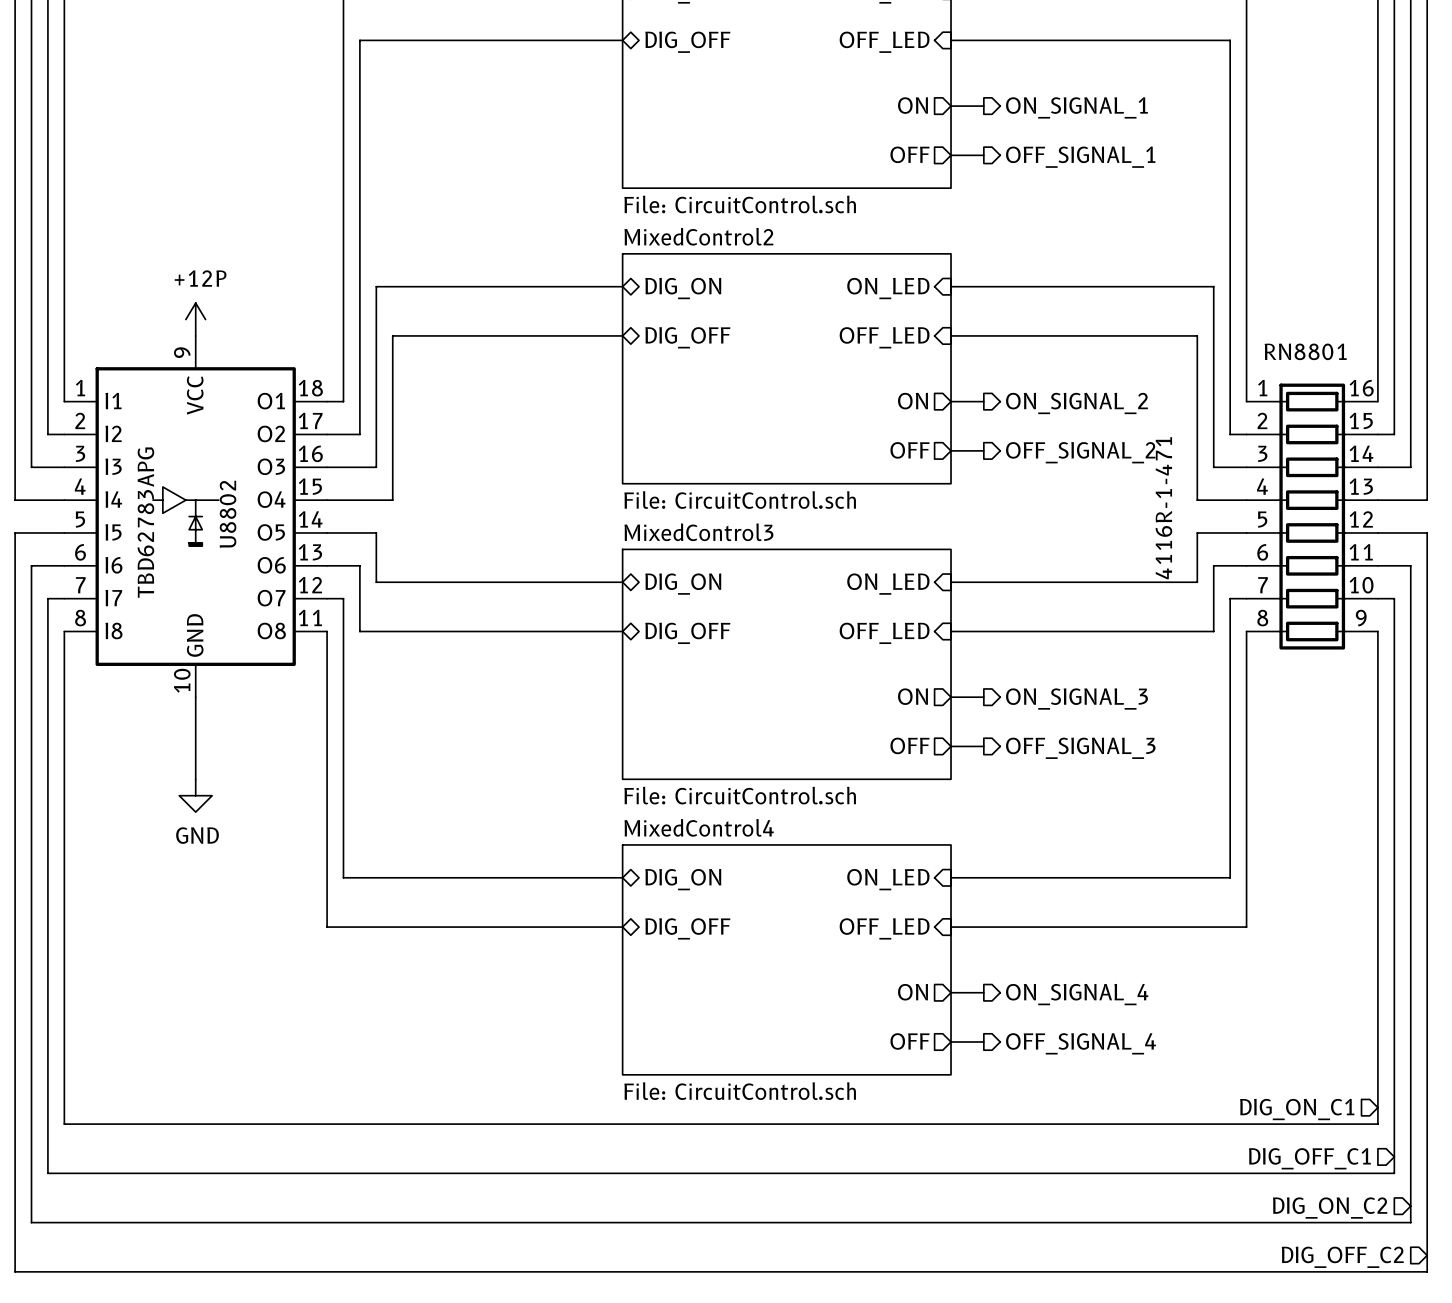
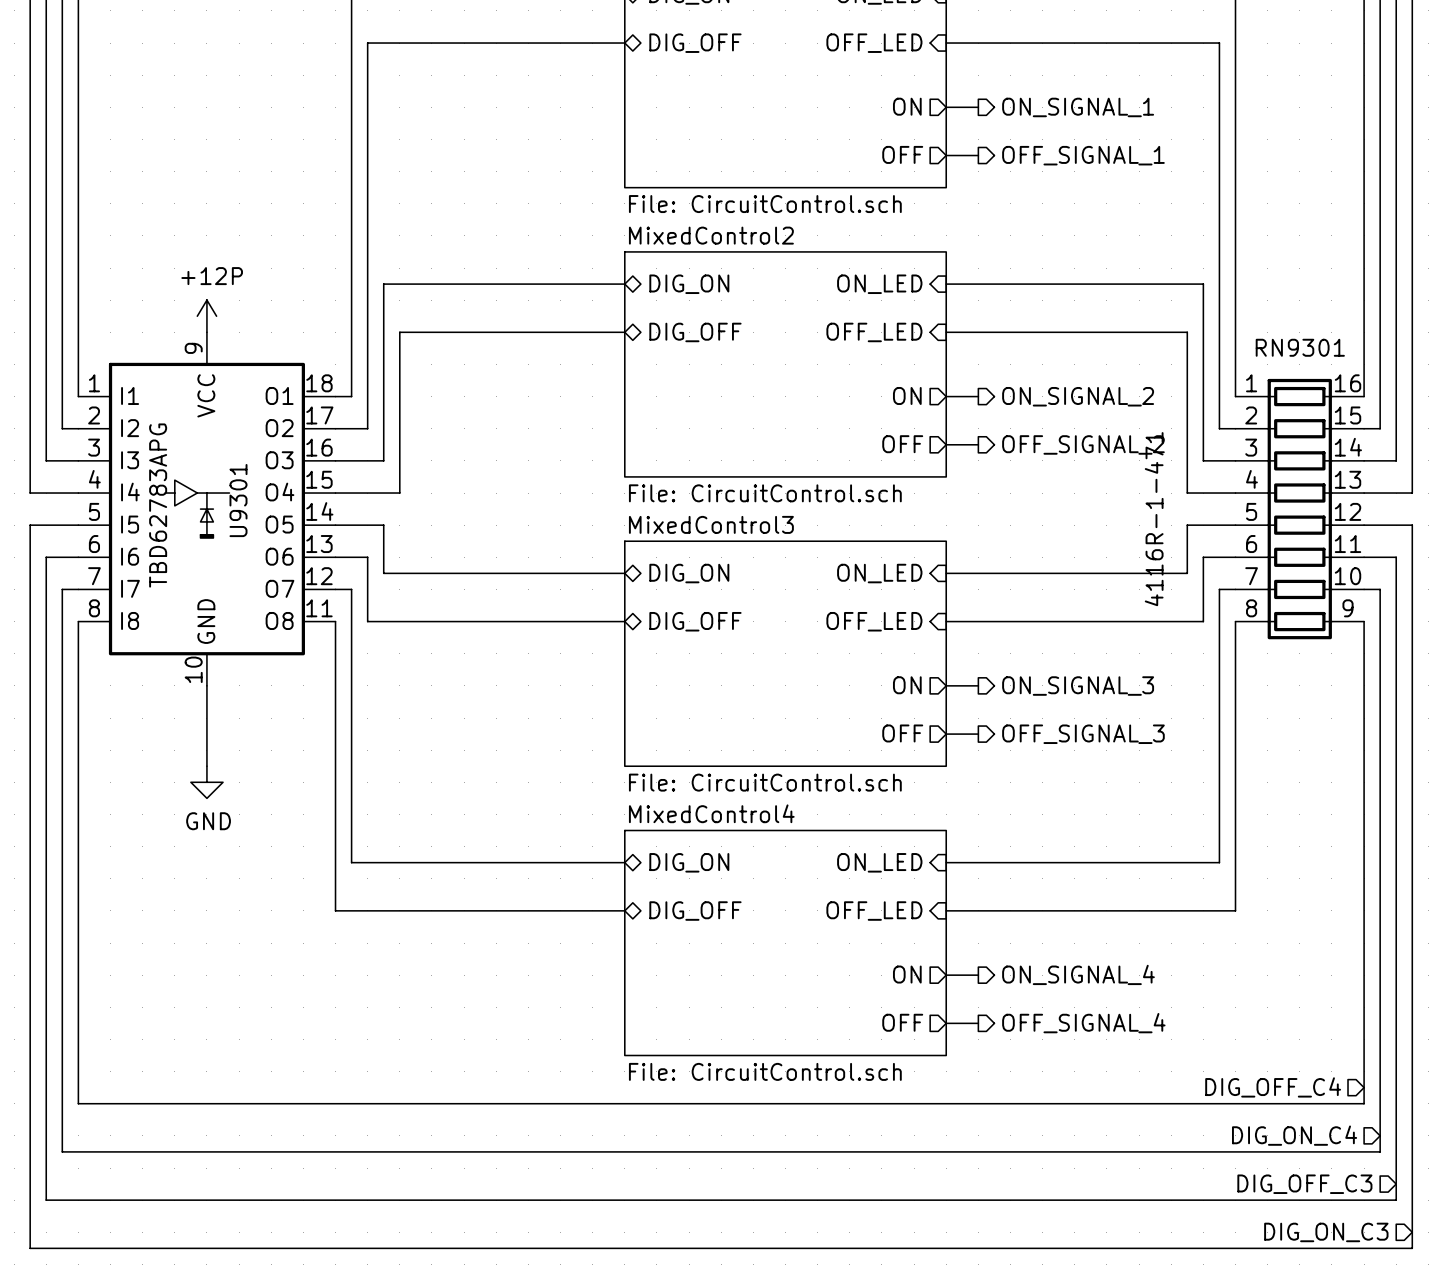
RN8801 name: RN8801 (1305, 351) -> RN9301 (1300, 347)
U8802 name: U8802 (228, 514) -> U9301 (238, 500)
hierarchical label: DIG_ON_C1 (1297, 1109) -> DIG_OFF_C4 (1273, 1087)
hierarchical label: DIG_OFF_C1 (1309, 1158) -> DIG_ON_C4 (1294, 1135)
hierarchical label: DIG_ON_C2 (1330, 1208) -> DIG_OFF_C3 (1304, 1184)
hierarchical label: DIG_OFF_C2 (1342, 1257) -> DIG_ON_C3 (1326, 1232)

